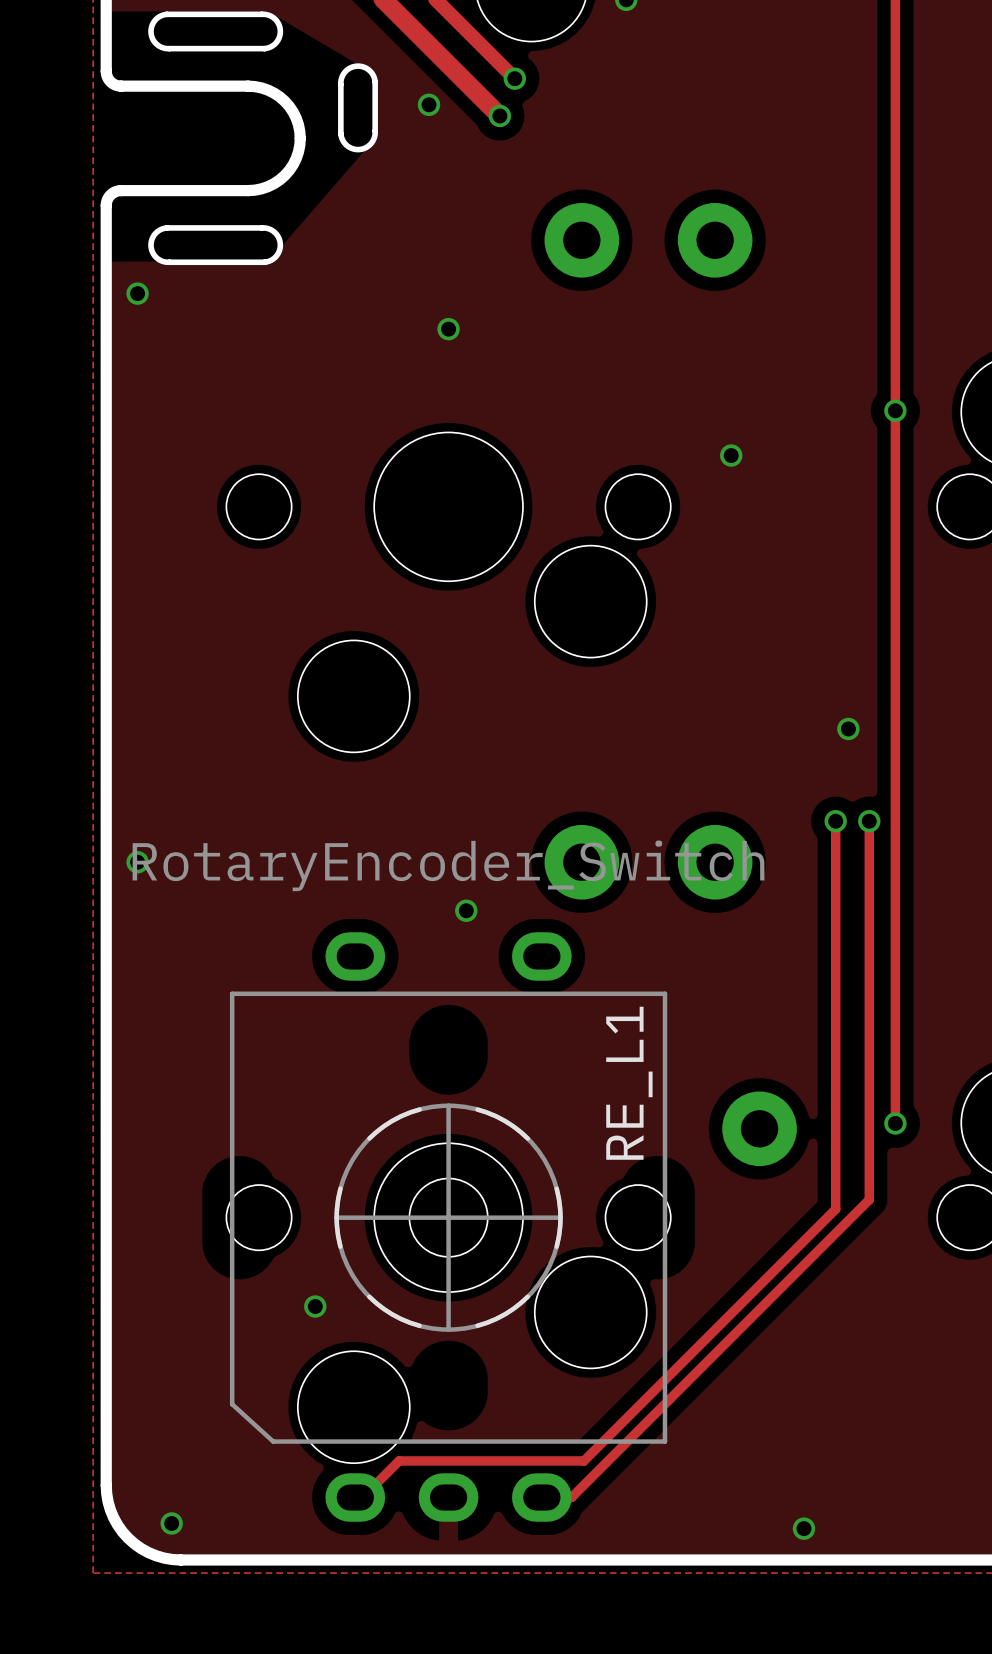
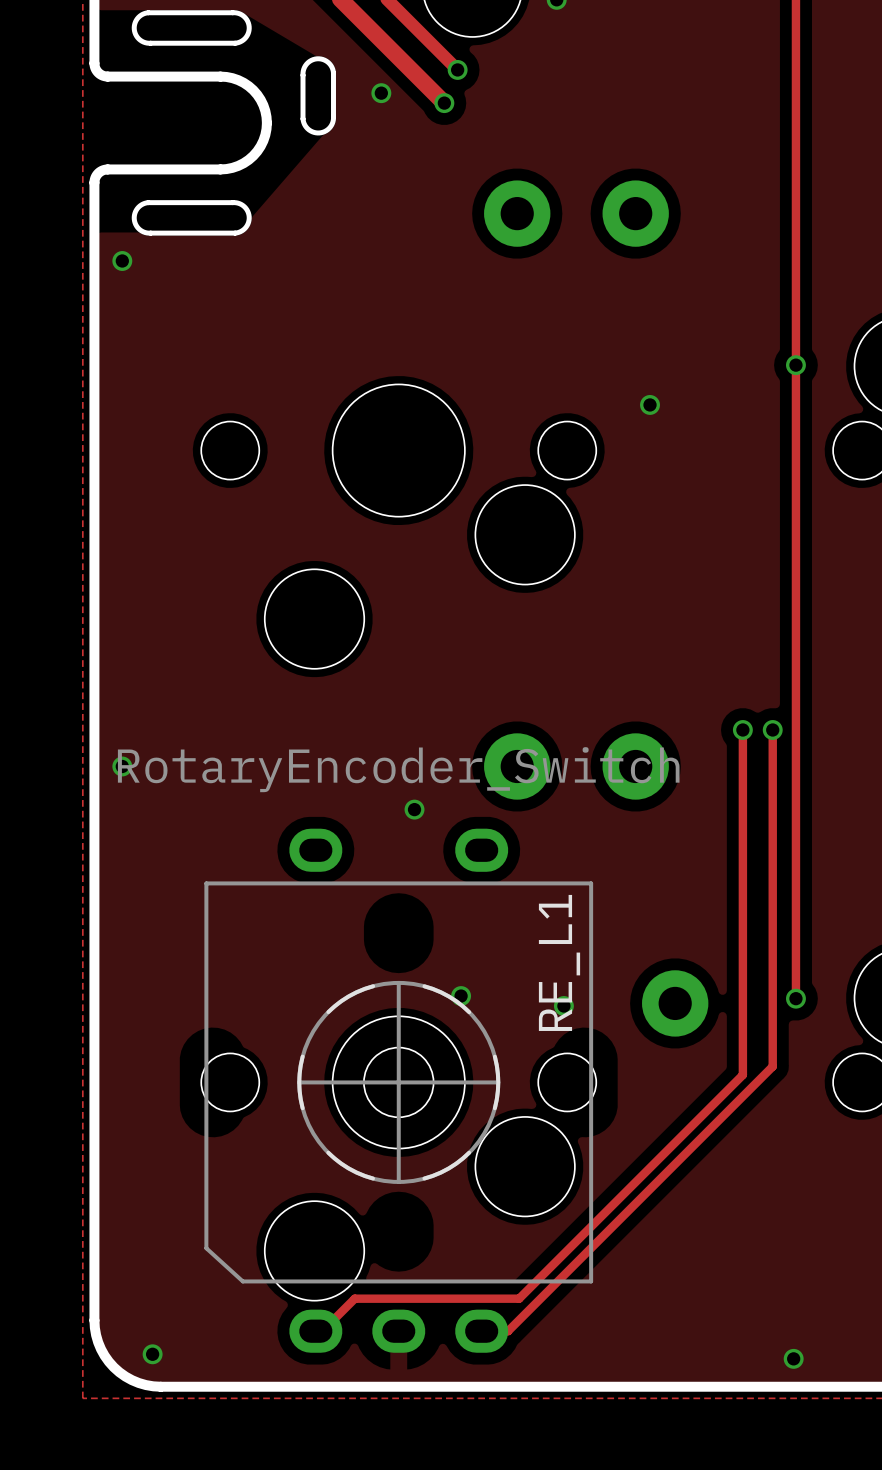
via: (448, 329) -> none
via: (848, 728) -> none
via: none -> (461, 996)
via: none -> (563, 1006)
via: (315, 1306) -> none
via position: (803, 1528) -> (793, 1358)

